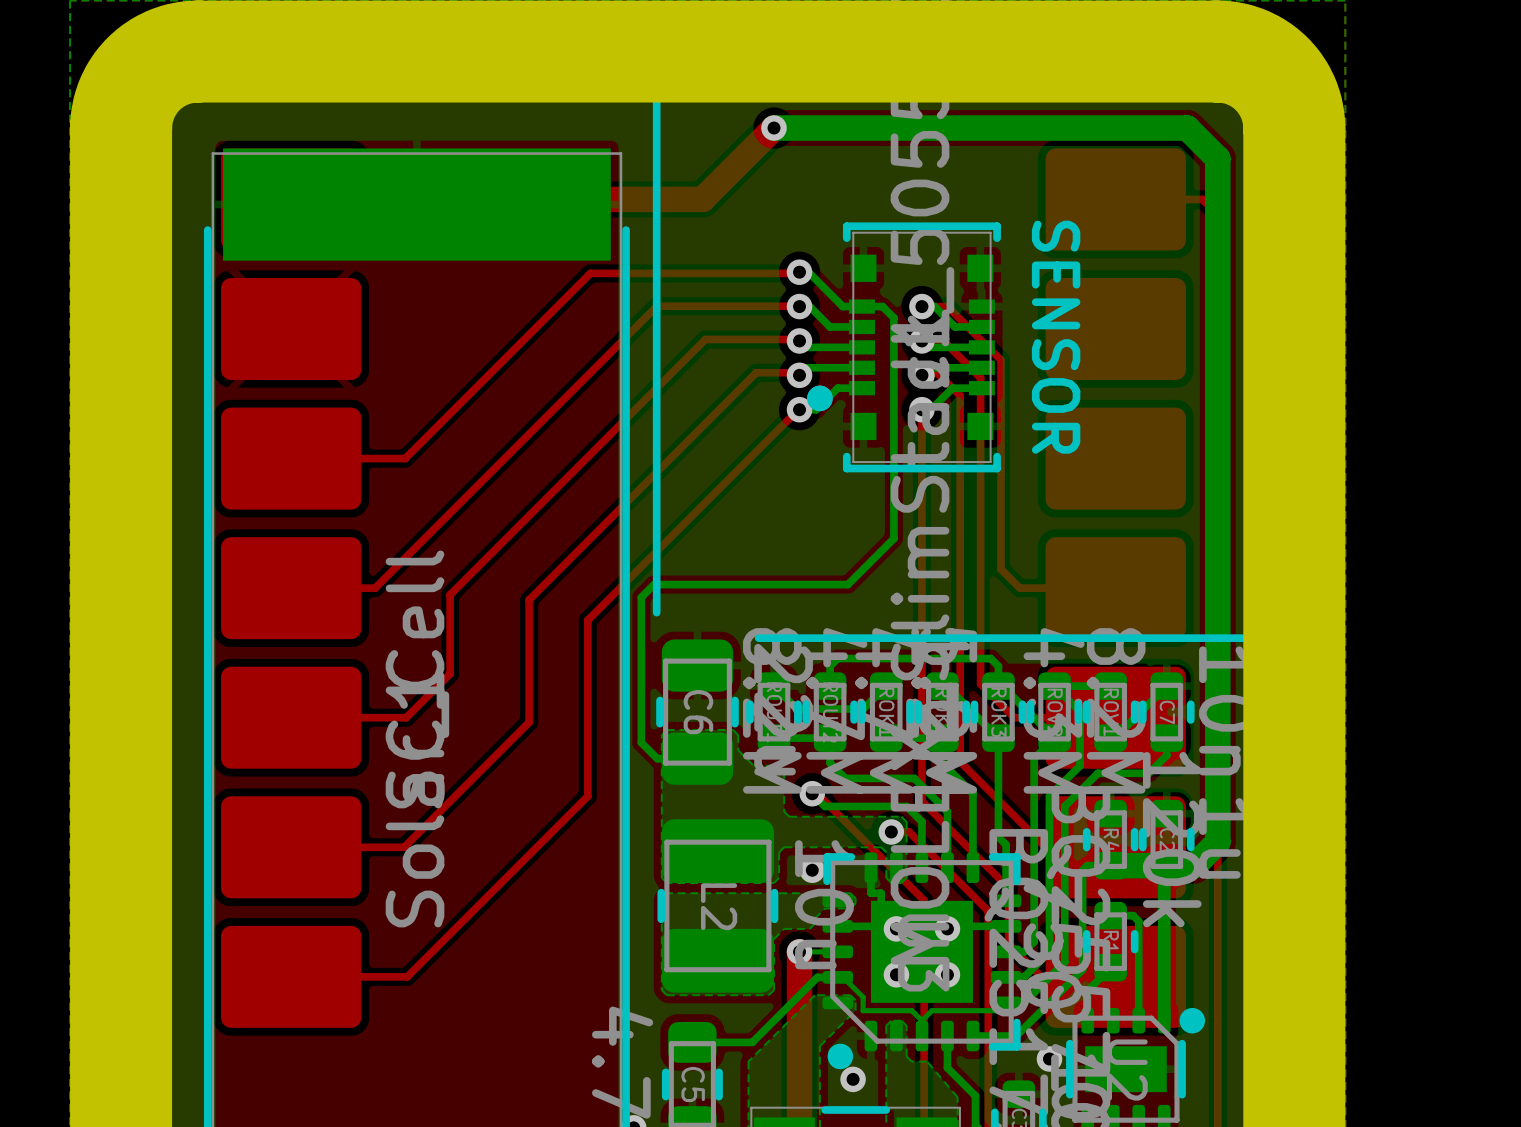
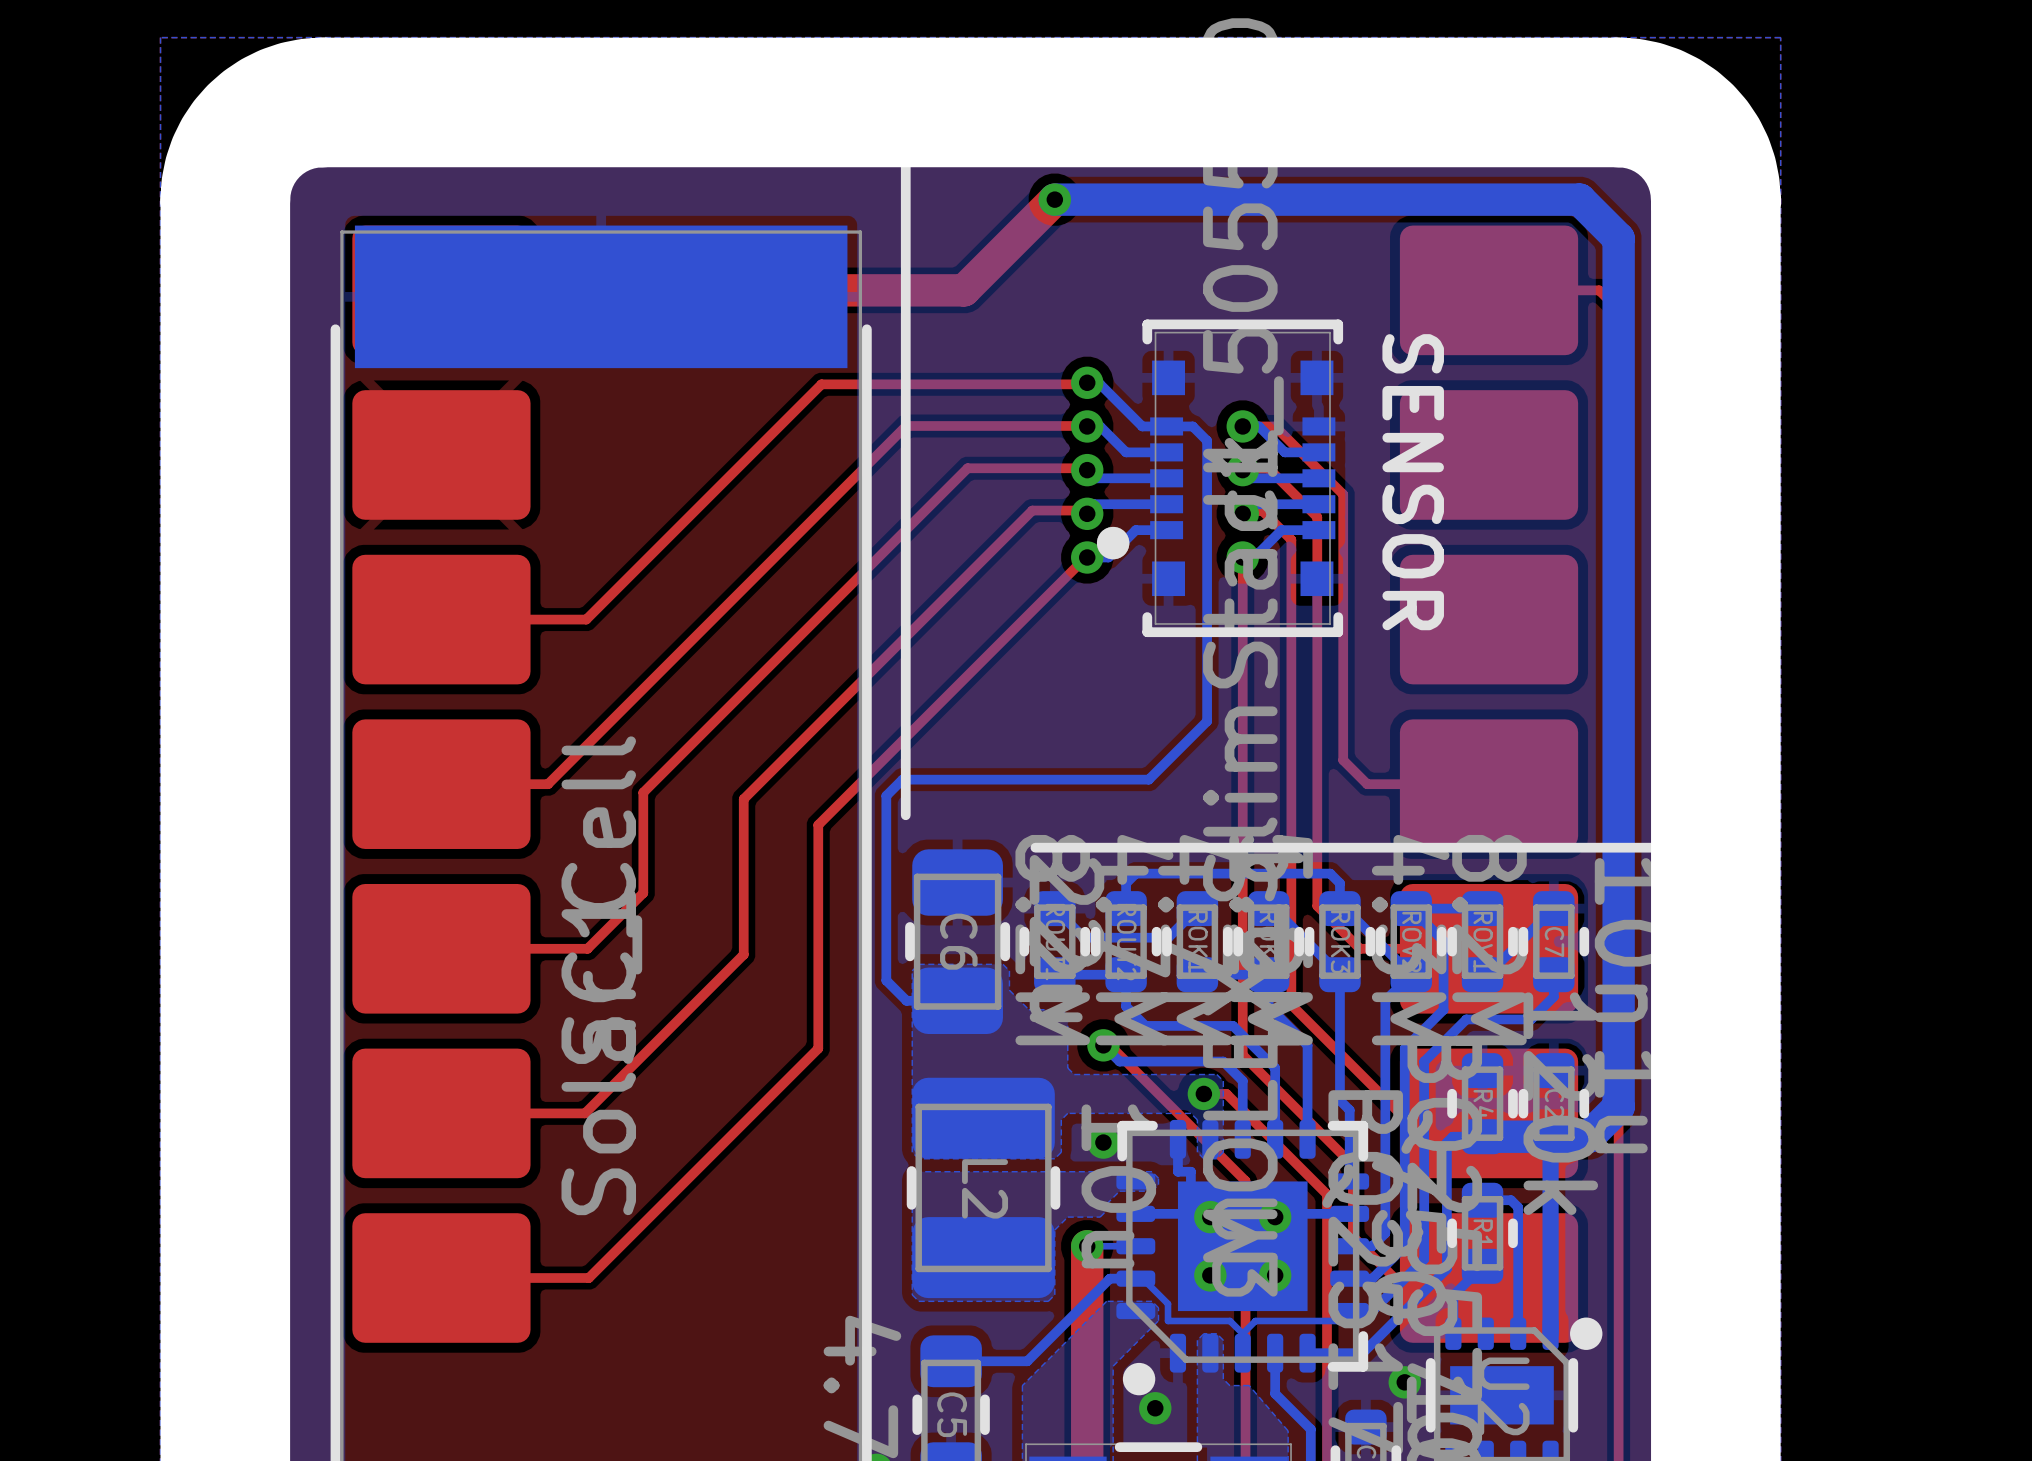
text position: SENSOR (1056, 337) -> SENSOR (1413, 482)

